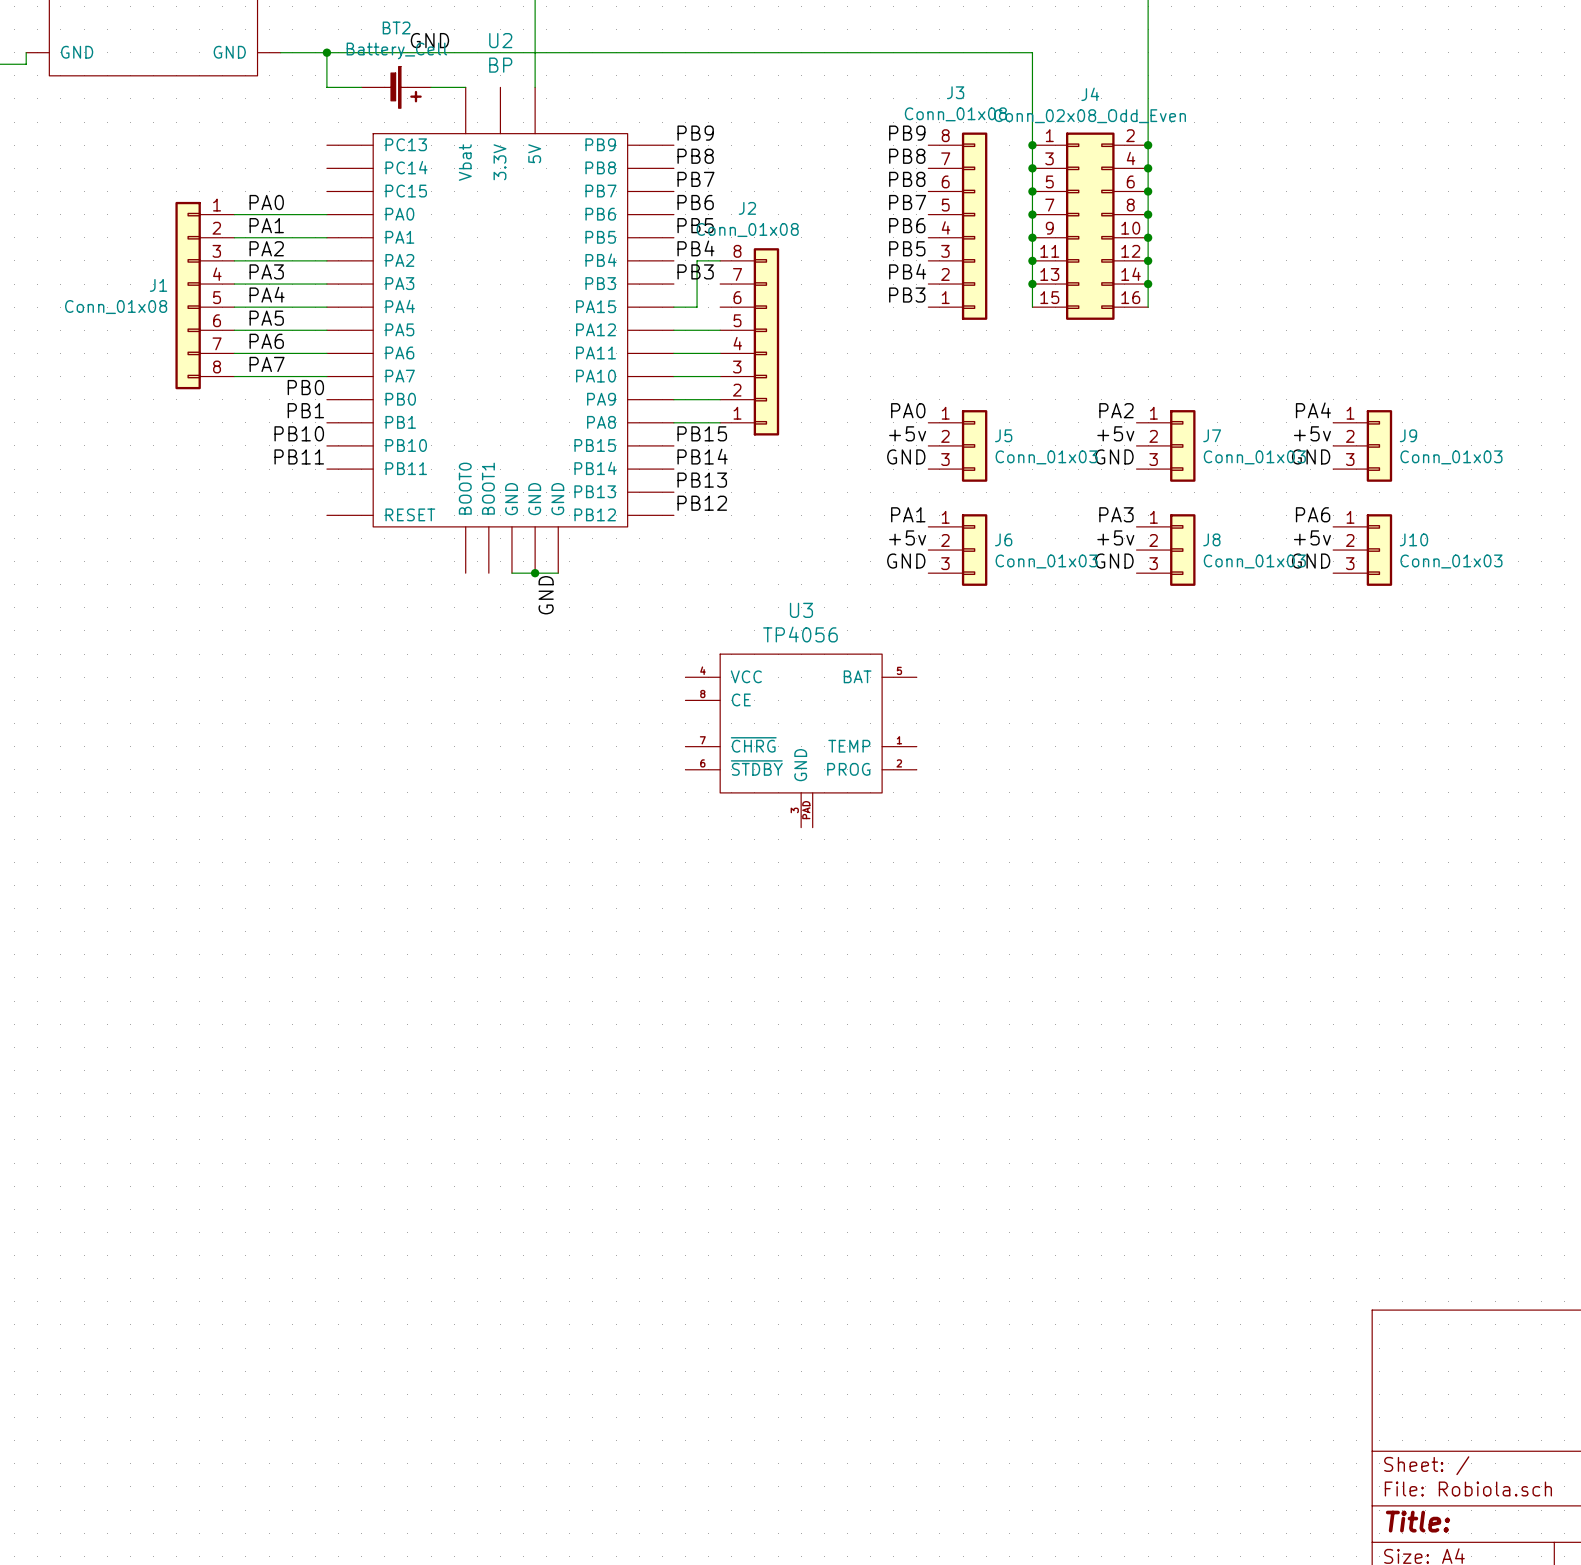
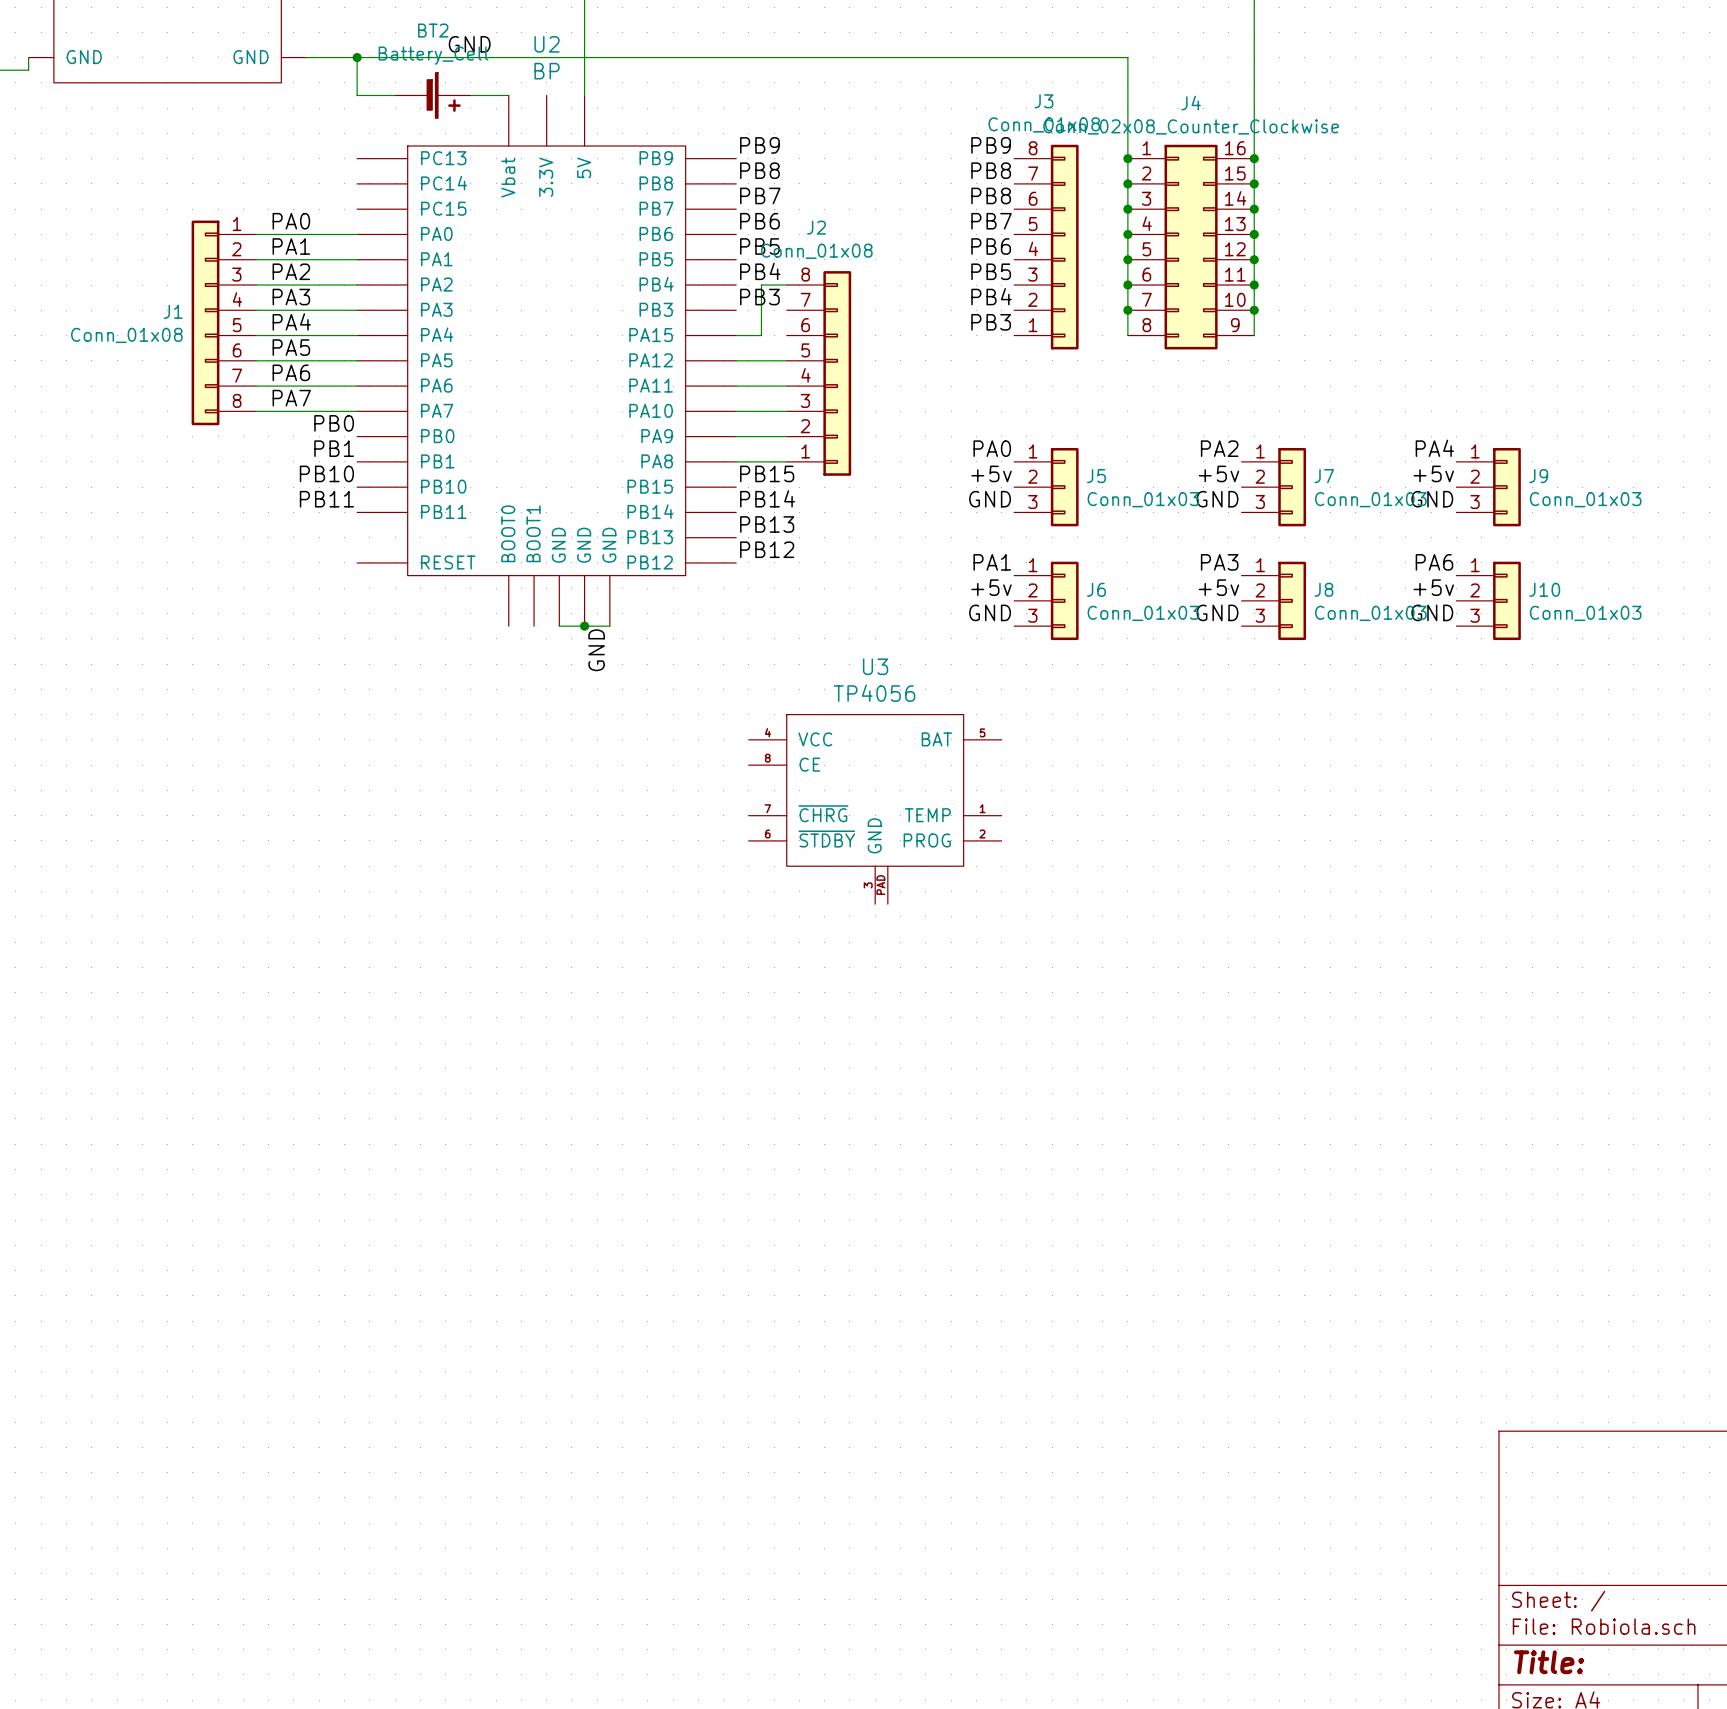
J4 value: Conn_02x08_Odd_Even (1090, 116) -> Conn_02x08_Counter_Clockwise (1191, 126)
J4 symbol: [1032, 132, 1149, 320] -> [1127, 144, 1255, 350]

